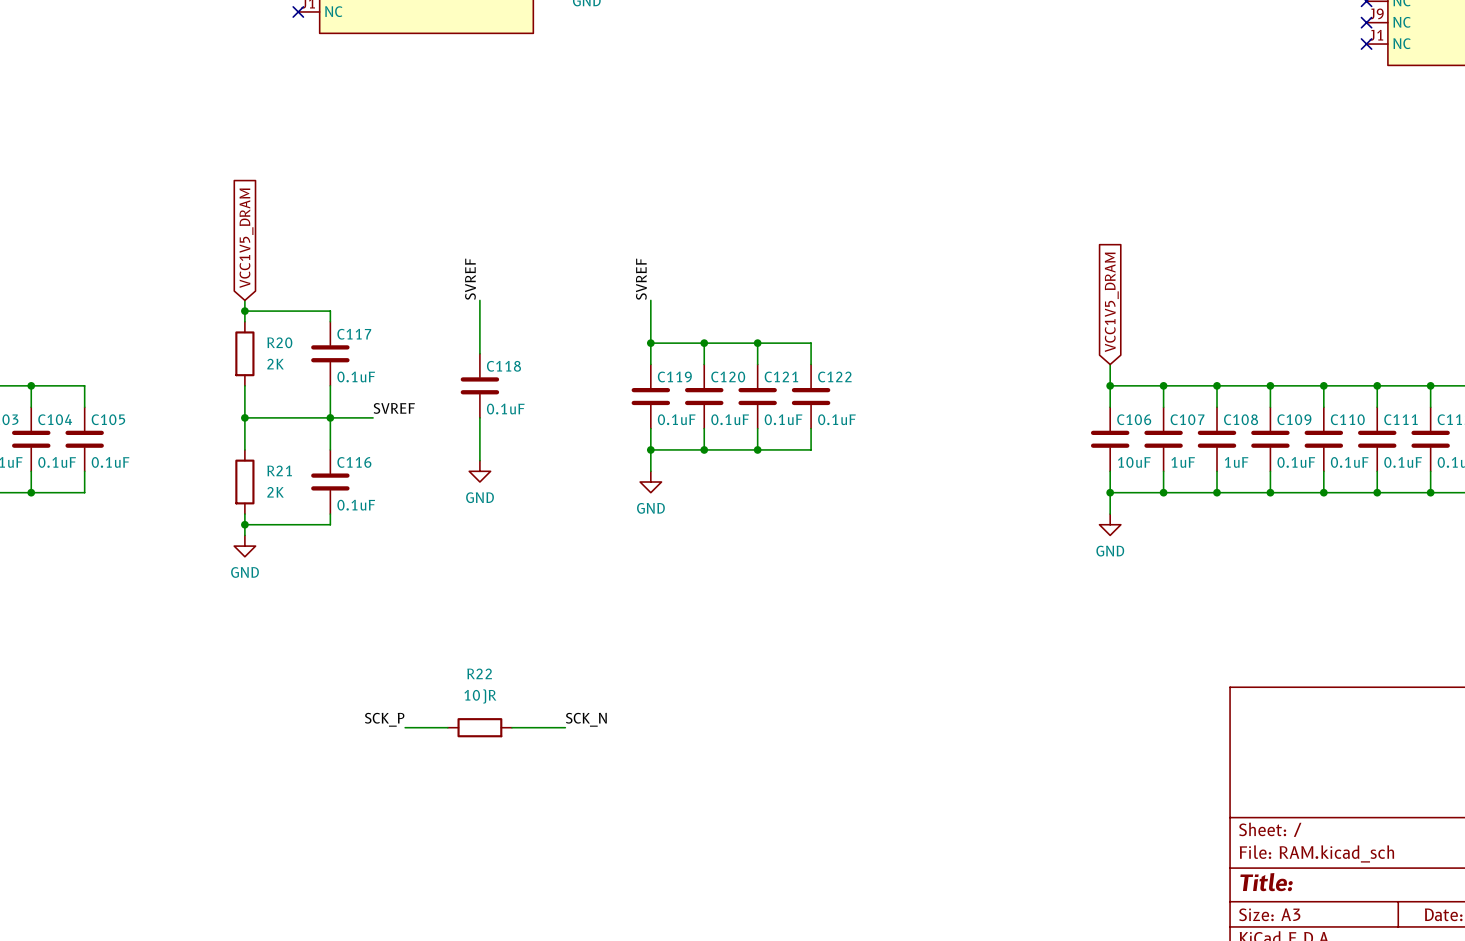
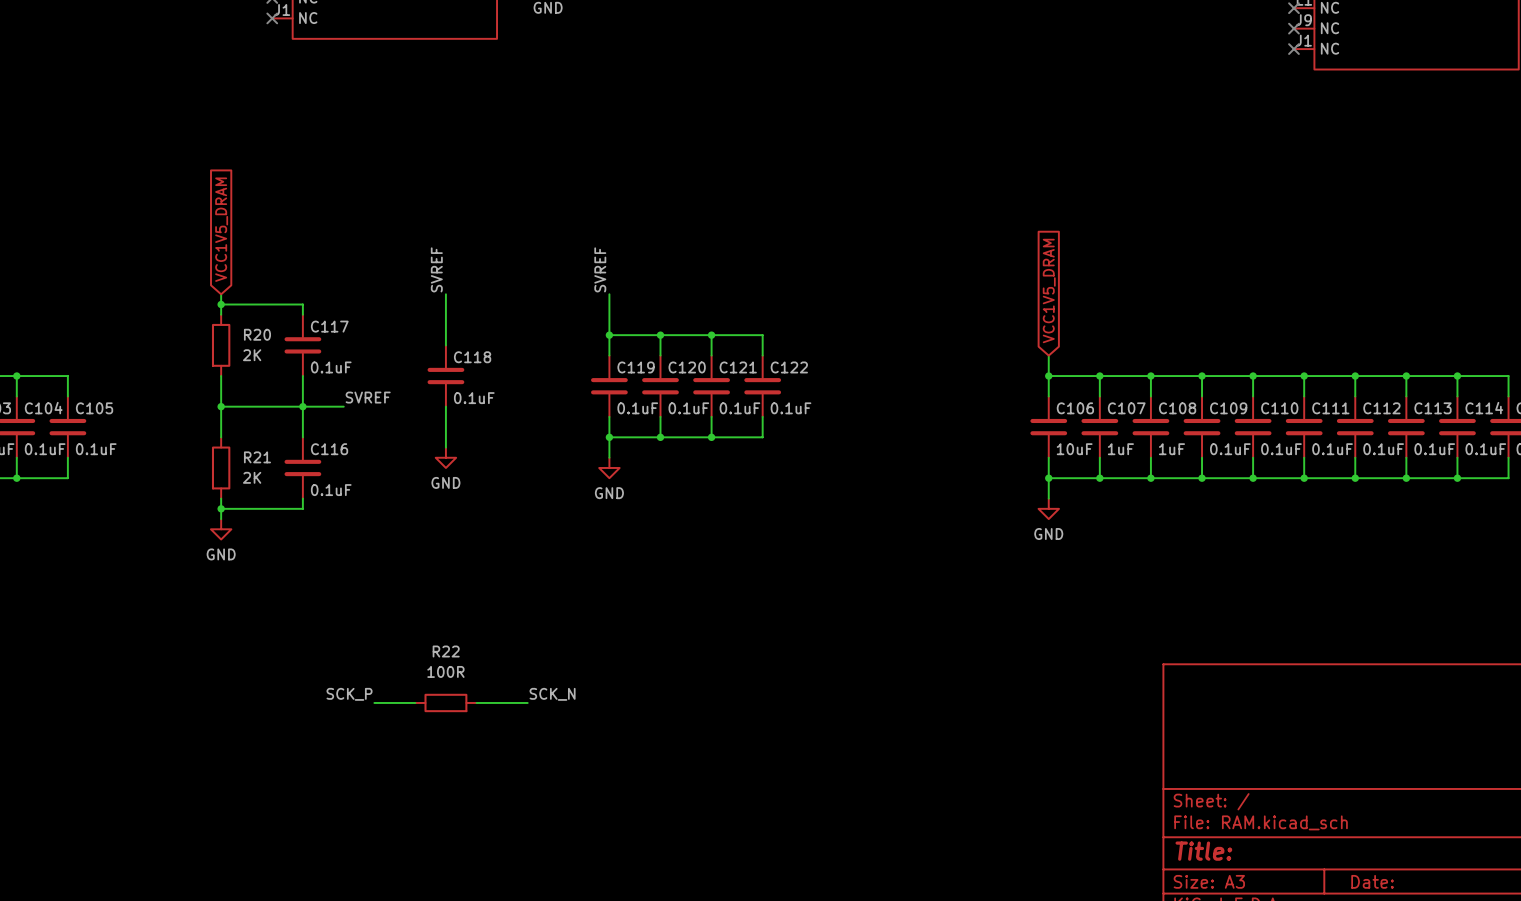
R22 value: 10)R (480, 696) -> 100R (445, 671)

